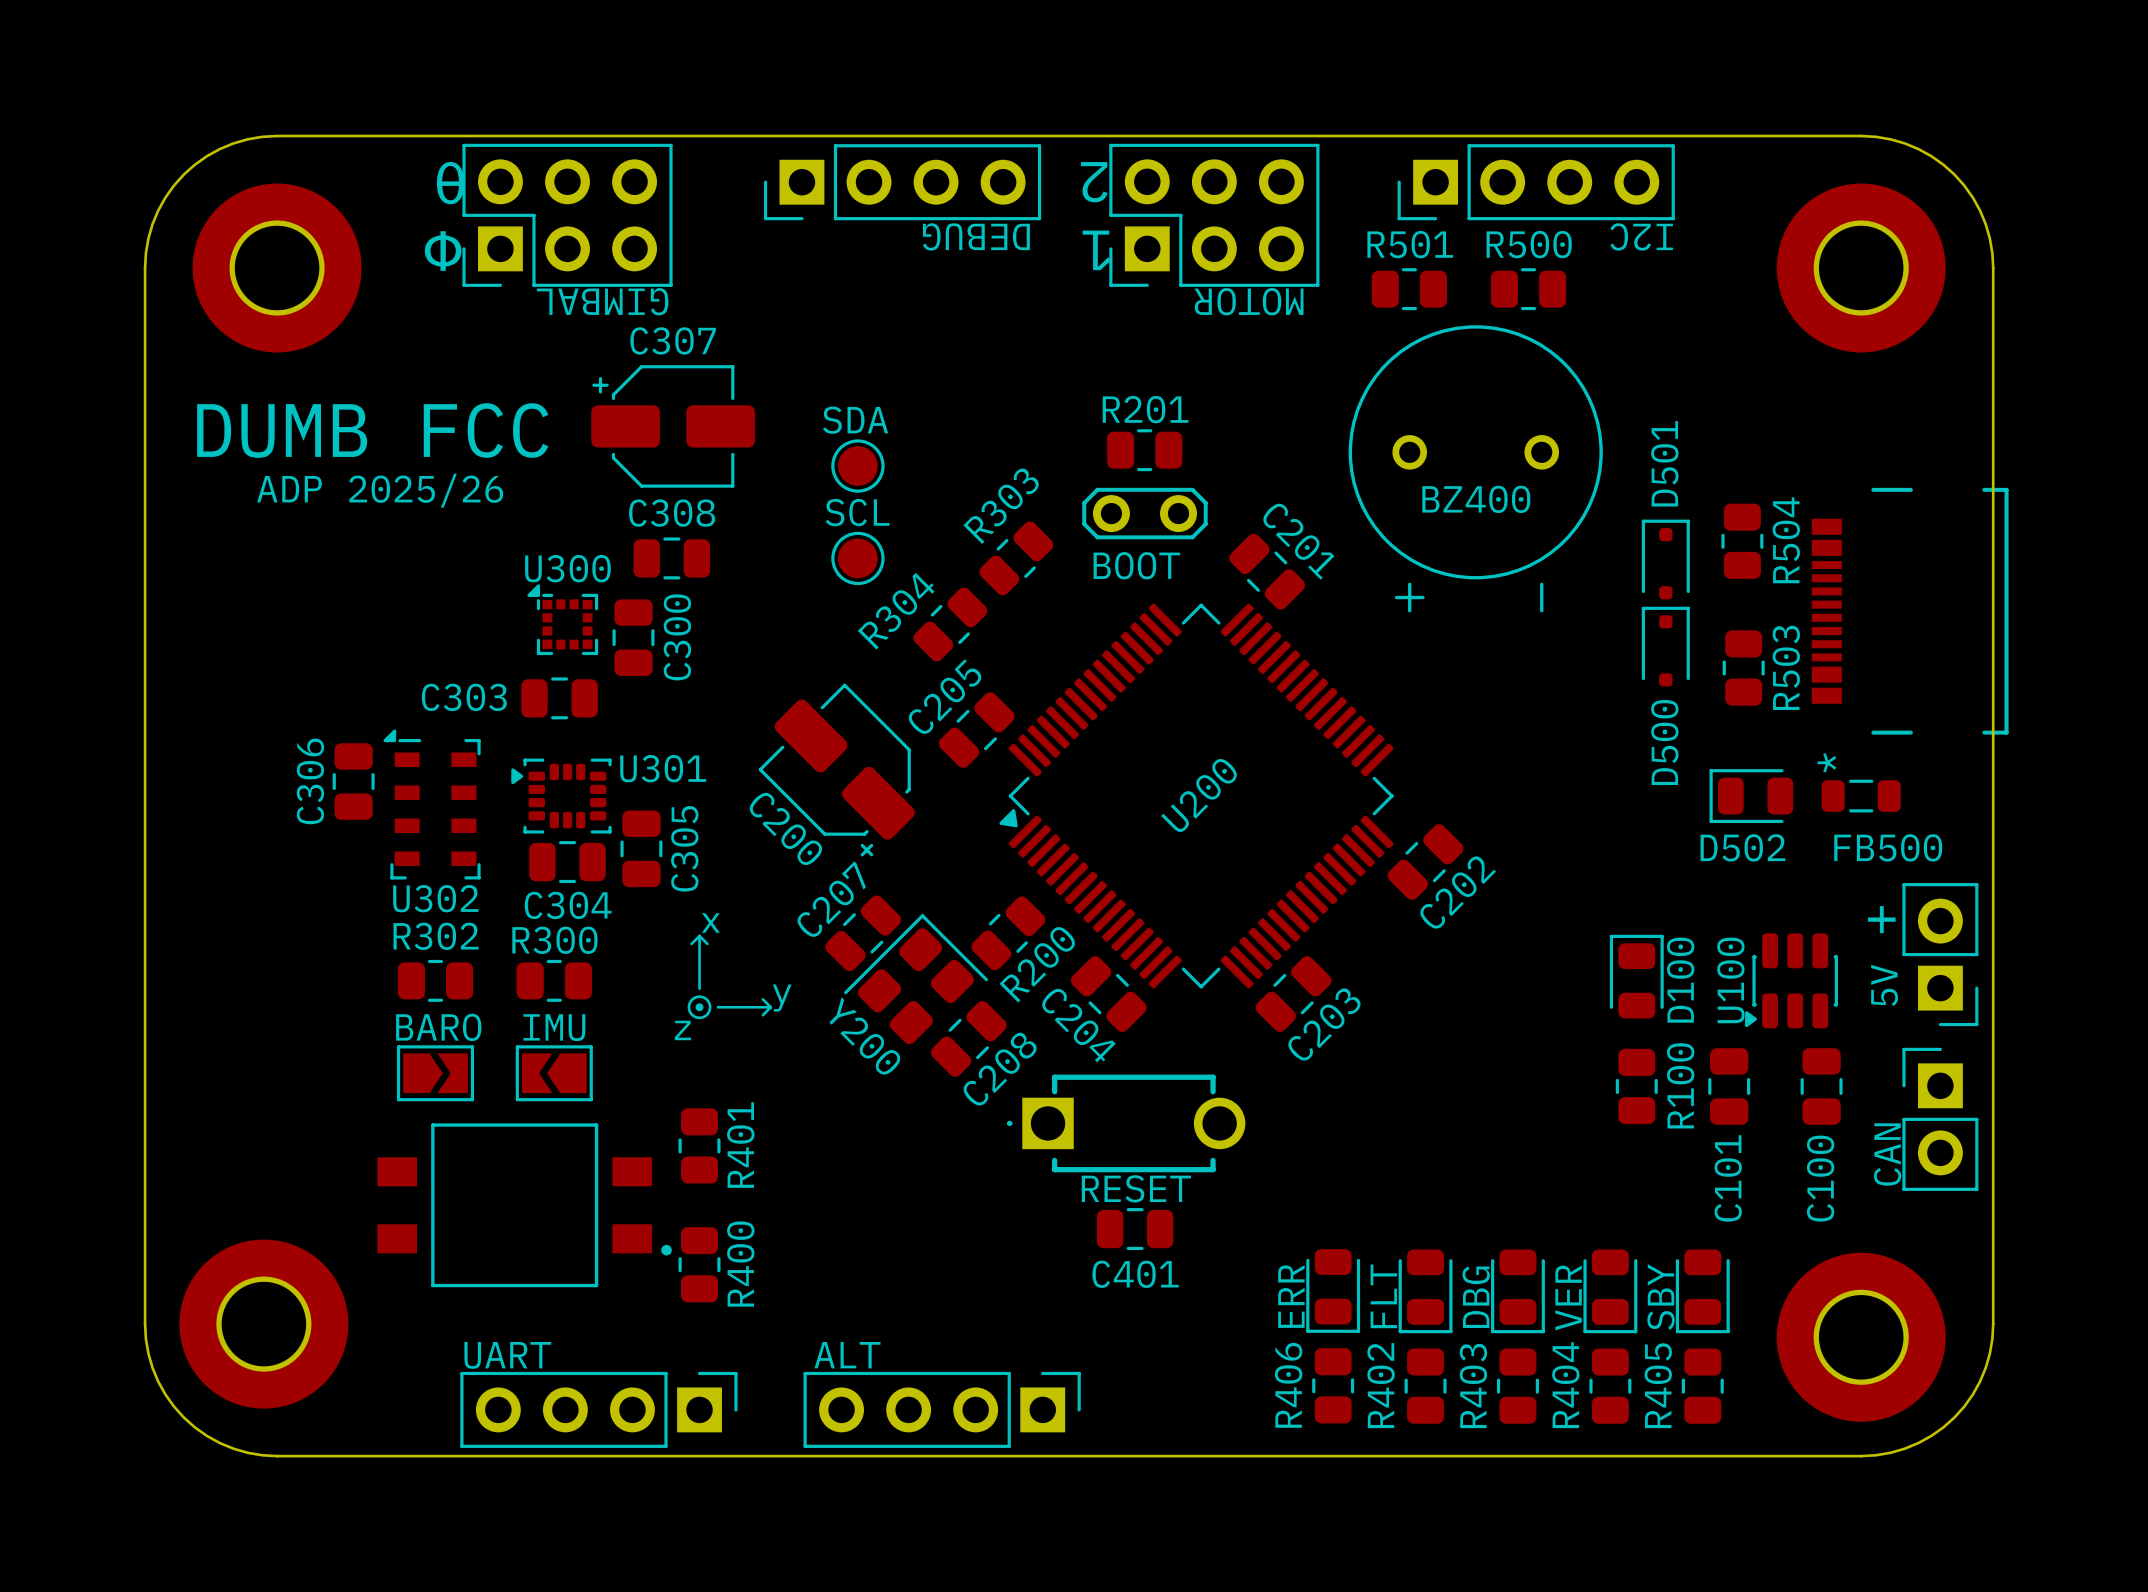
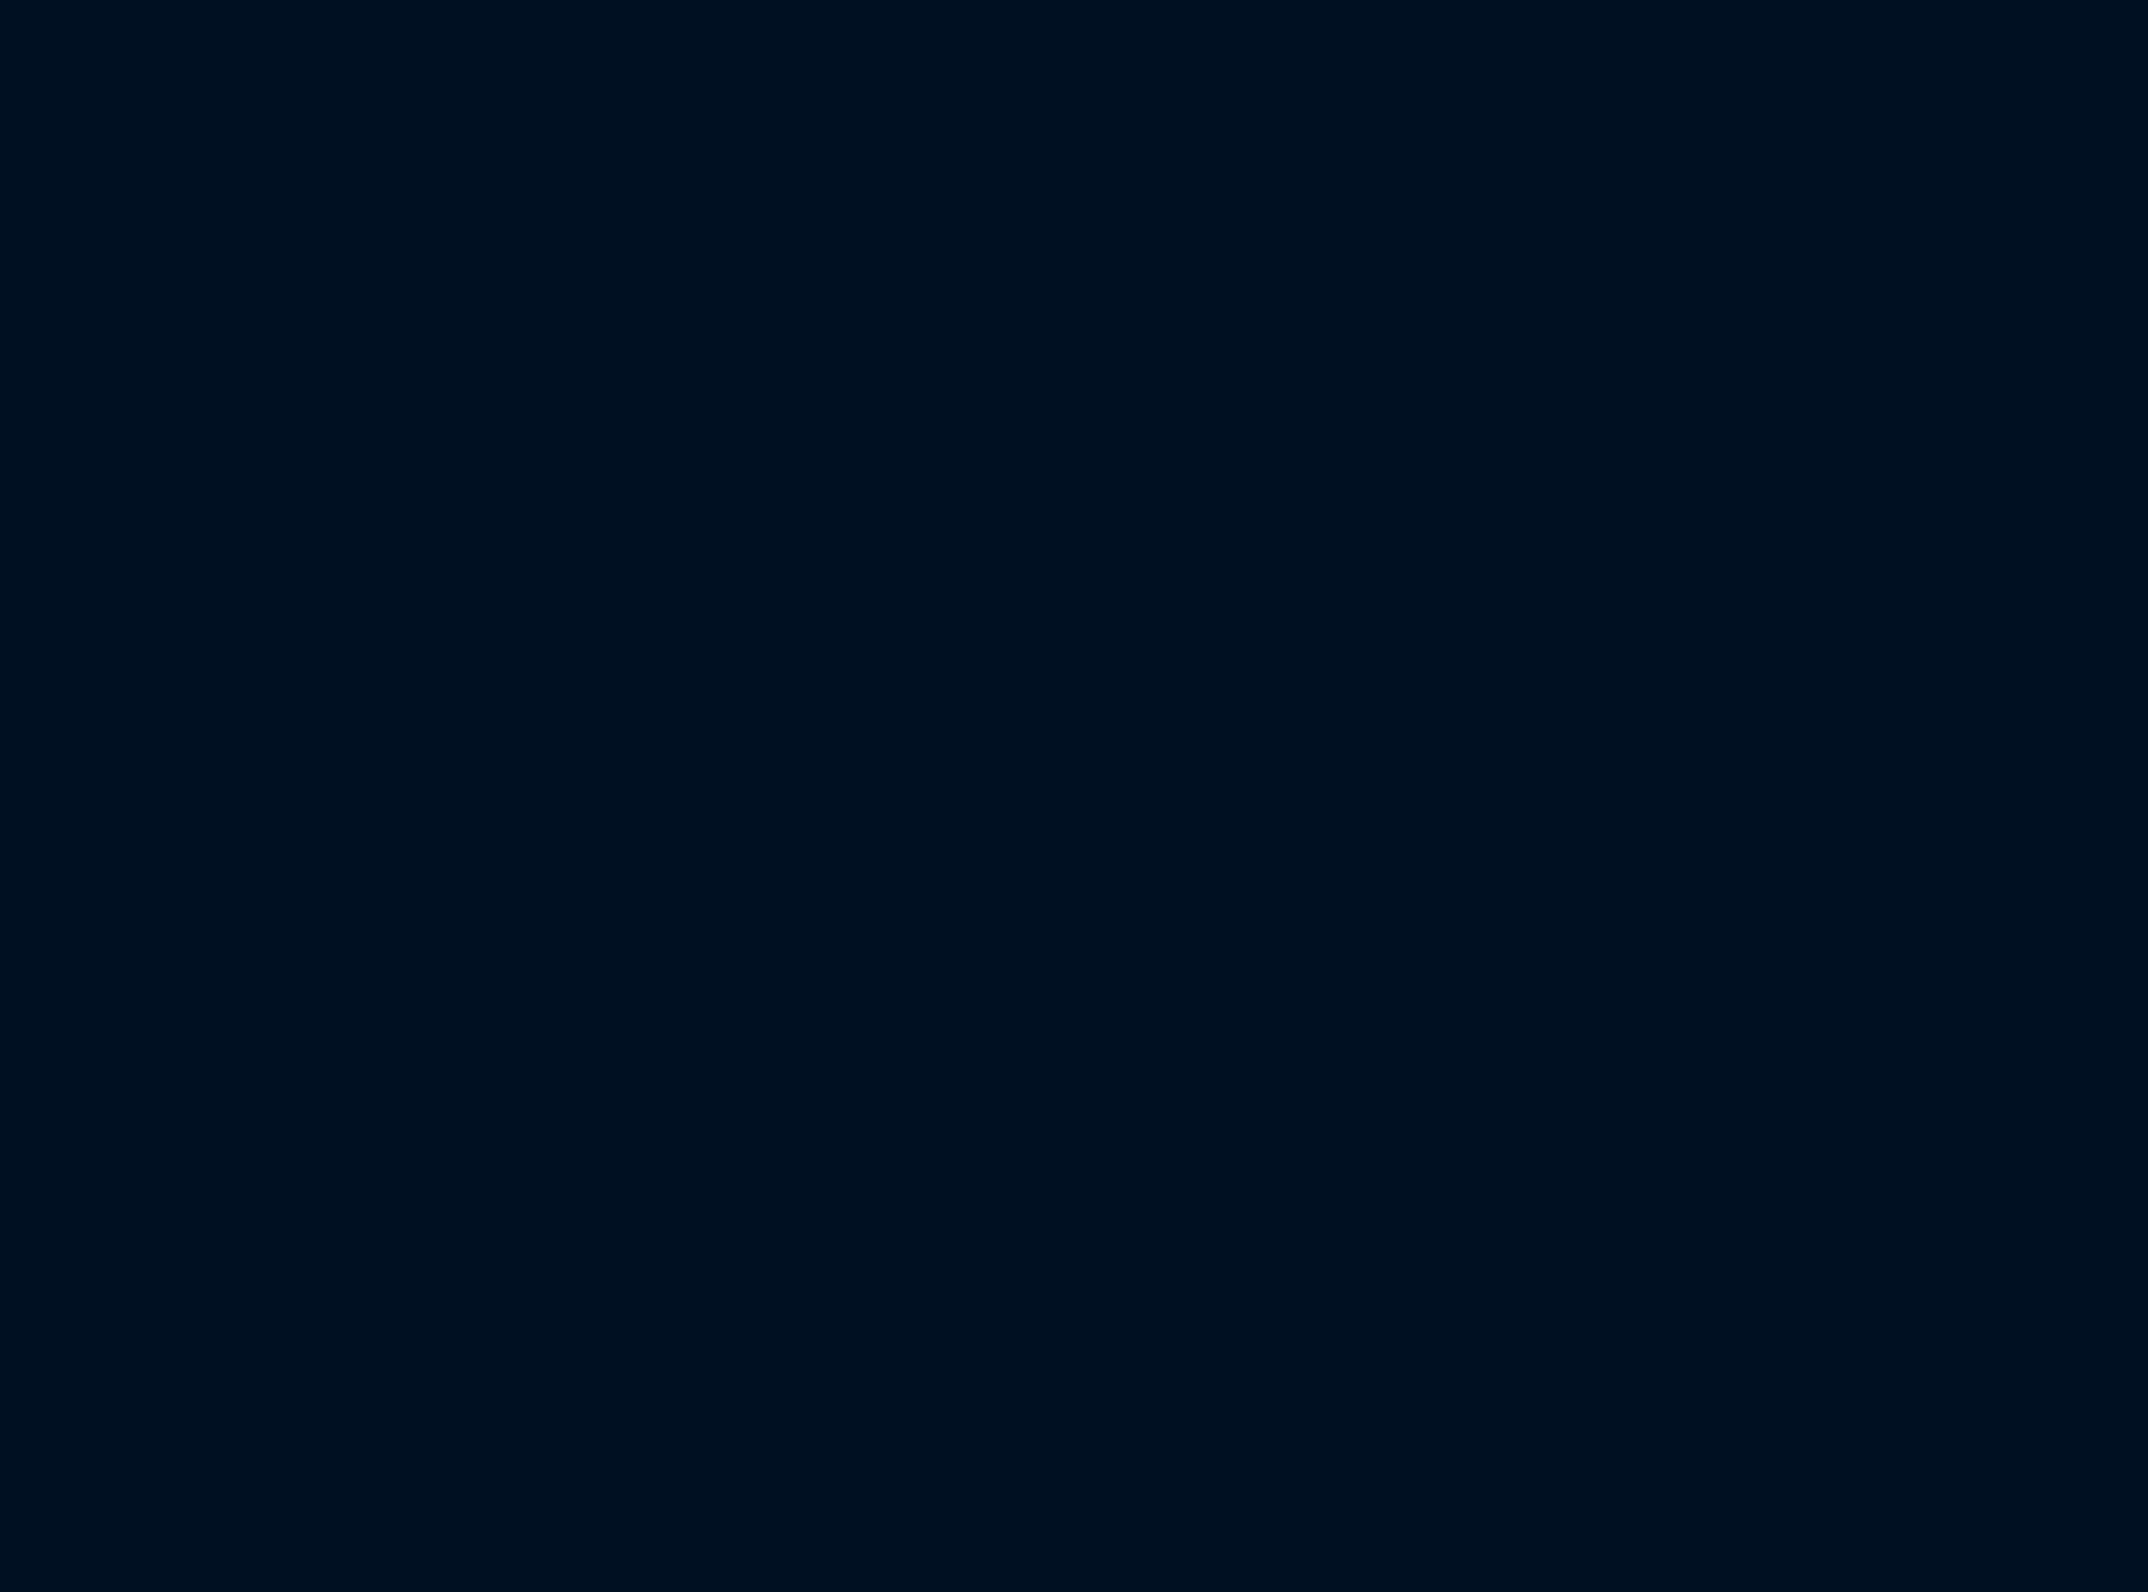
board edge: (277, 136) (1861, 136) (1890, 139) (1904, 143) (1918, 149) (1943, 164) (1964, 185) (1980, 210) (1989, 238) (1993, 268) (1993, 1324) (1989, 1353) (1985, 1367) (1972, 1394) (1964, 1406) (1943, 1427) (1918, 1443) (1890, 1452) (1861, 1456) (277, 1456) (262, 1455) (233, 1448) (219, 1443) (194, 1427) (173, 1406) (158, 1381) (148, 1353) (145, 1324) (145, 253) (152, 224) (158, 210) (173, 185) (194, 164) (206, 156) (233, 143) (262, 136) (277, 136) -> none
part: (902, 182) -> none
text: 2 (1094, 182) -> none
part: (1536, 182) -> none
text: θ (450, 183) -> none
part: (567, 215) -> none
part: (1214, 215) -> none
text: DEBUG (976, 236) -> none
text: I2C (1641, 236) -> none
text: 1 (1096, 250) -> none
text: Φ (443, 251) -> none
part: (277, 268) -> none
part: (1861, 268) -> none
R501: (1409, 289) -> none
R500: (1528, 289) -> none
text: GIMBAL (602, 301) -> none
text: MOTOR (1249, 301) -> none
text: SDA (855, 420) -> none
C307: (673, 426) -> none
text: DUMB FCC (372, 430) -> none
R201: (1144, 450) -> none
part: (857, 466) -> none
BZ400: (1475, 468) -> none
text: ADP 2025/26 (380, 490) -> none
text: SCL (857, 512) -> none
part: (1144, 513) -> none
R504: (1742, 541) -> none
C308: (671, 558) -> none
part: (857, 558) -> none
R303: (1016, 558) -> none
D501: (1665, 559) -> none
text: BOOT (1136, 565) -> none
C201: (1267, 571) -> none
part: (1910, 611) -> none
U300: (562, 619) -> none
R304: (950, 624) -> none
C300: (633, 637) -> none
D500: (1665, 646) -> none
R503: (1743, 668) -> none
C303: (559, 698) -> none
C205: (976, 730) -> none
C200: (836, 770) -> none
C306: (353, 781) -> none
U301: (561, 796) -> none
U200: (1196, 796) -> none
D502: (1751, 796) -> none
FB500: (1861, 796) -> none
U302: (432, 804) -> none
C305: (641, 848) -> none
C304: (567, 862) -> none
C202: (1425, 862) -> none
text: + (1881, 919) -> none
text: x (710, 923) -> none
C207: (863, 933) -> none
R200: (1008, 933) -> none
line: (699, 935) (707, 943) -> none
line: (699, 935) (699, 988) -> none
line: (699, 935) (691, 943) -> none
part: (1940, 954) -> none
D100: (1636, 976) -> none
Y200: (916, 979) -> none
R302: (435, 980) -> none
R300: (554, 980) -> none
U100: (1791, 980) -> none
text: 5V (1884, 985) -> none
C204: (1108, 994) -> none
C203: (1293, 994) -> none
drawing: [687, 995, 712, 1020] -> none
text: y (782, 998) -> none
line: (762, 999) (770, 1007) -> none
line: (718, 1007) (770, 1007) -> none
line: (770, 1007) (762, 1015) -> none
text: BARO (438, 1027) -> none
text: IMU (554, 1027) -> none
text: z (682, 1030) -> none
C208: (968, 1038) -> none
part: (435, 1073) -> none
part: (554, 1073) -> none
R100: (1636, 1086) -> none
C101: (1729, 1086) -> none
C100: (1821, 1086) -> none
part: (1940, 1119) -> none
part: (1126, 1123) -> none
R401: (699, 1145) -> none
text: CAN (1887, 1154) -> none
text: RESET (1136, 1188) -> none
part: (524, 1205) -> none
C401: (1135, 1229) -> none
R400: (699, 1264) -> none
part: (1333, 1291) -> none
part: (1425, 1291) -> none
part: (1517, 1291) -> none
part: (1610, 1291) -> none
part: (1702, 1291) -> none
text: ERR (1291, 1296) -> none
text: FLT (1383, 1296) -> none
text: DBG (1476, 1297) -> none
text: VER (1568, 1297) -> none
text: SBY (1661, 1297) -> none
part: (263, 1324) -> none
part: (1861, 1337) -> none
text: UART (507, 1355) -> none
text: ALT (847, 1355) -> none
R406: (1333, 1385) -> none
R402: (1425, 1386) -> none
R403: (1517, 1386) -> none
R404: (1610, 1386) -> none
R405: (1702, 1386) -> none
part: (598, 1409) -> none
part: (942, 1409) -> none

